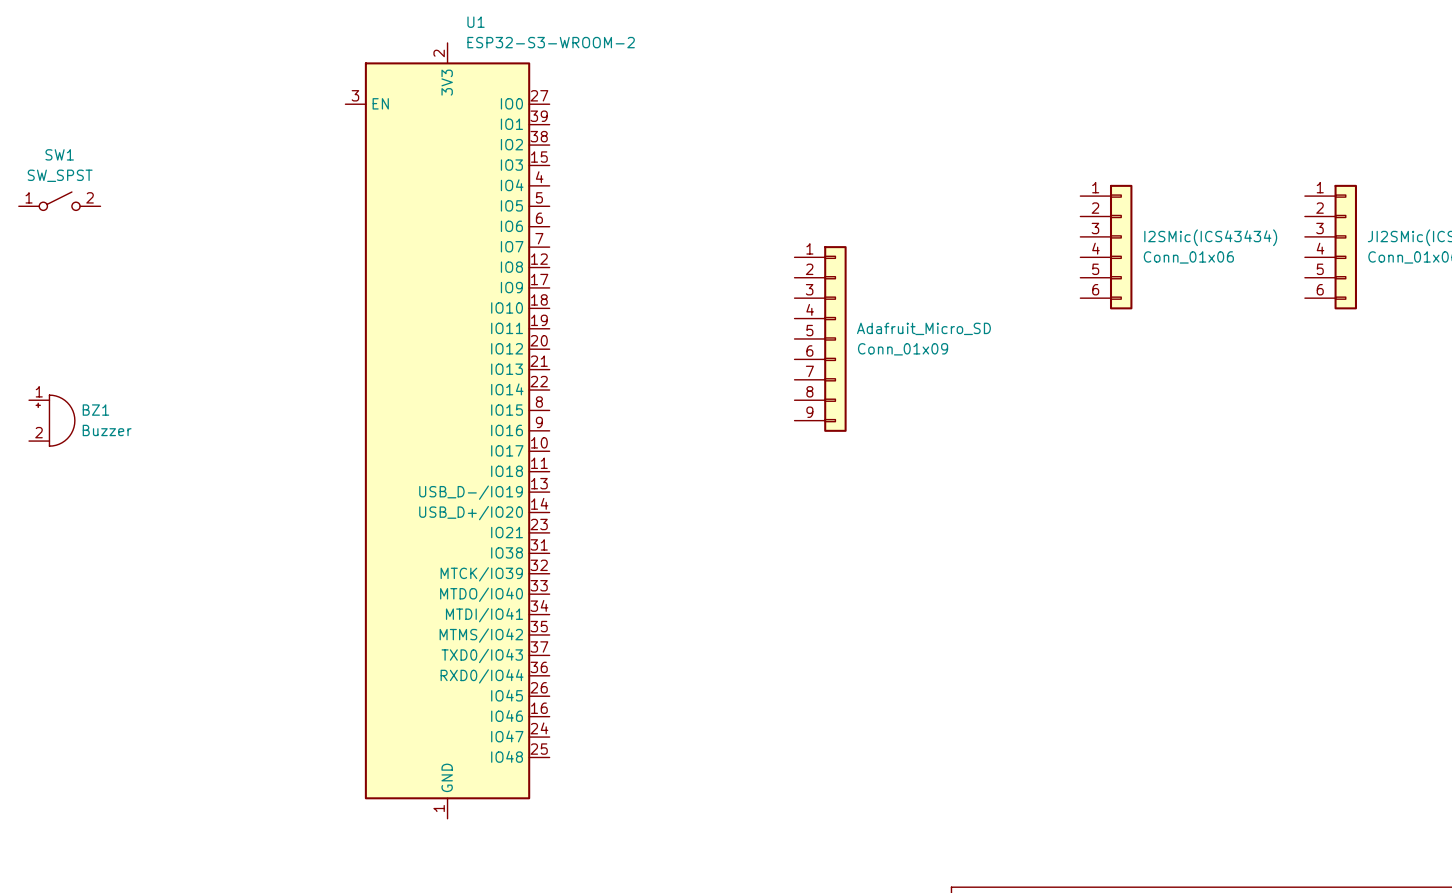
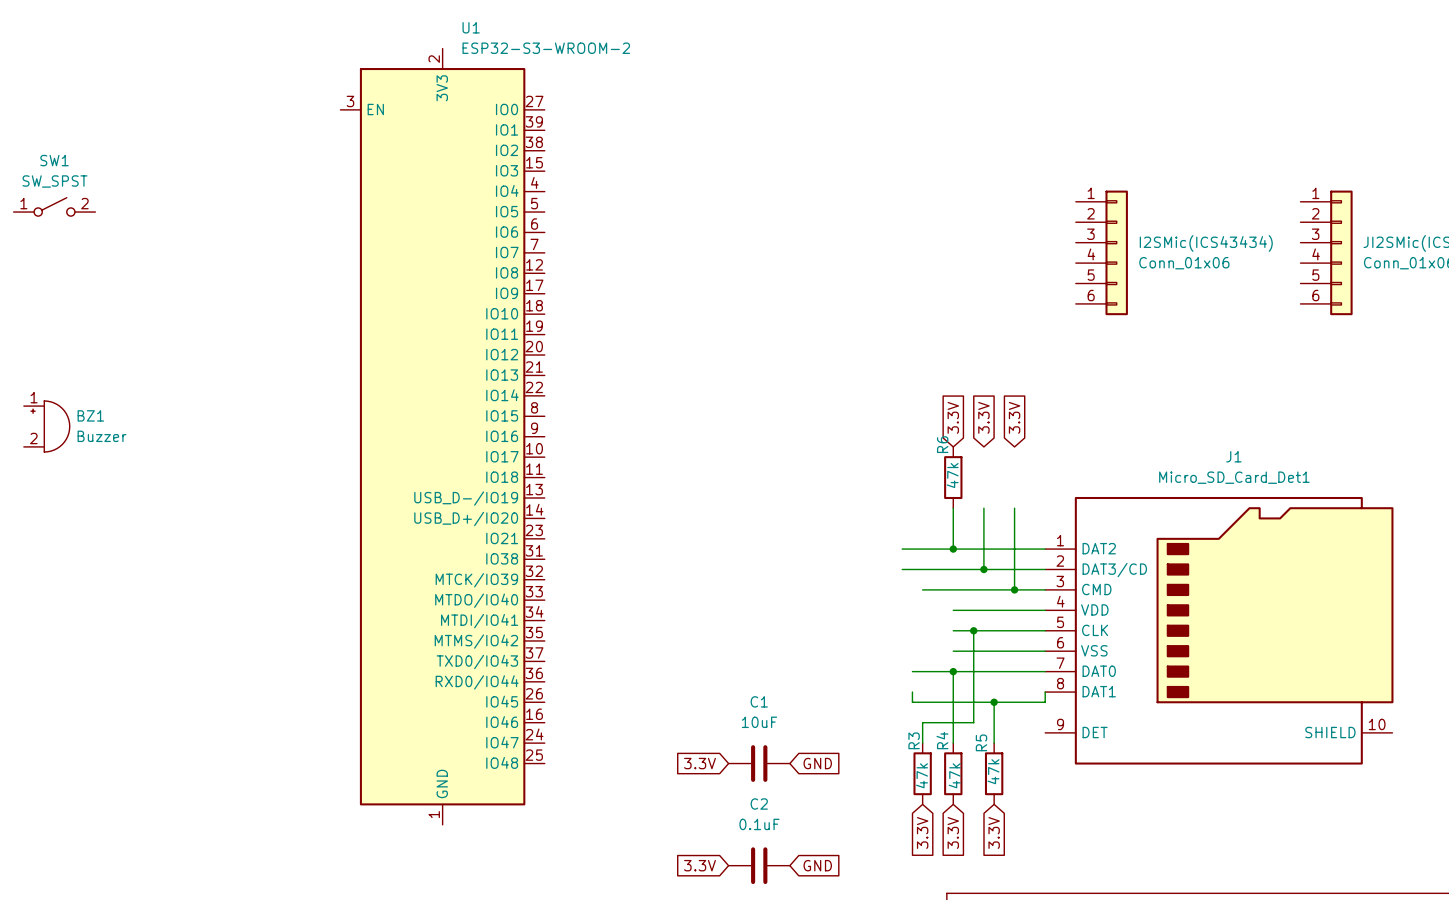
Adafruit_Micro_SD: Conn_01x09 (820, 338) -> none
global label: none -> 3.3V (953, 417)
global label: none -> 3.3V (983, 417)
global label: none -> 3.3V (1014, 417)
R6: none -> 47k (953, 477)
wire: none -> (953, 508) (953, 549)
wire: none -> (983, 508) (983, 569)
wire: none -> (1014, 508) (1014, 589)
wire: none -> (902, 549) (1045, 549)
junction: none -> (953, 549)
wire: none -> (902, 569) (1045, 569)
junction: none -> (983, 569)
wire: none -> (922, 589) (1045, 589)
junction: none -> (1014, 589)
wire: none -> (953, 610) (1045, 610)
wire: none -> (953, 630) (1045, 630)
wire: none -> (973, 630) (973, 722) (922, 722) (922, 743)
junction: none -> (973, 630)
J1: none -> Micro_SD_Card_Det1 (1219, 630)
wire: none -> (953, 651) (1045, 651)
wire: none -> (912, 671) (1045, 671)
wire: none -> (953, 671) (953, 743)
junction: none -> (953, 671)
wire: none -> (912, 692) (912, 702) (1045, 702) (1045, 692)
wire: none -> (994, 702) (994, 743)
junction: none -> (994, 702)
global label: none -> 3.3V (700, 763)
C1: none -> 10uF (759, 763)
global label: none -> GND (817, 763)
R3: none -> 47k (922, 773)
R4: none -> 47k (953, 773)
R5: none -> 47k (994, 773)
global label: none -> 3.3V (922, 832)
global label: none -> 3.3V (953, 832)
global label: none -> 3.3V (994, 832)
global label: none -> 3.3V (700, 865)
C2: none -> 0.1uF (759, 865)
global label: none -> GND (817, 865)

